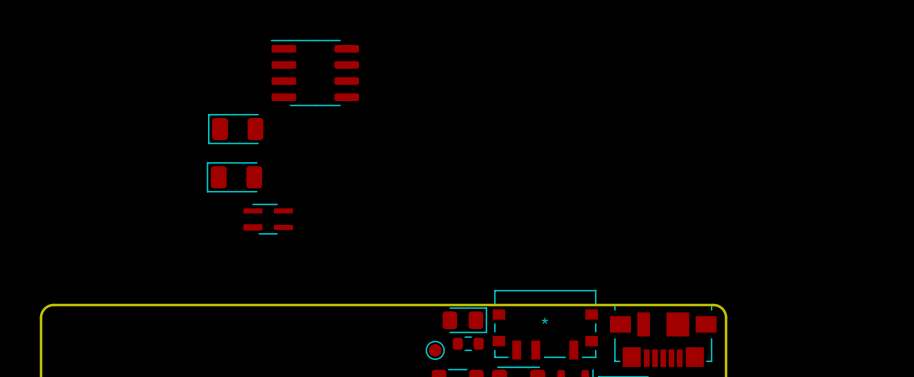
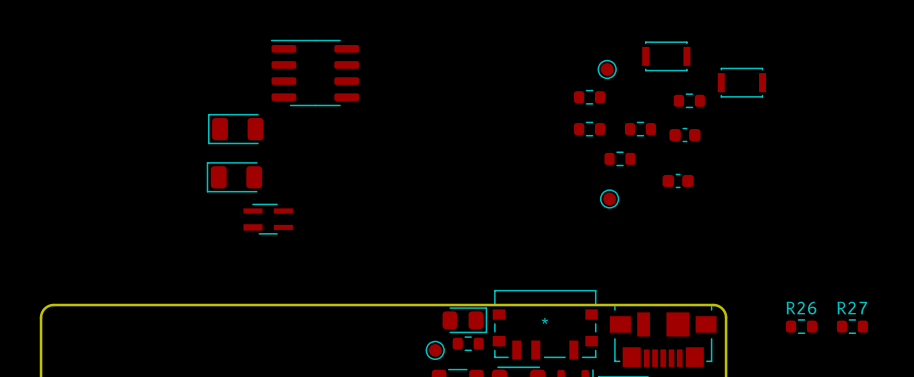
part: none -> (666, 56)
part: none -> (607, 69)
part: none -> (741, 82)
part: none -> (589, 97)
part: none -> (689, 100)
part: none -> (589, 129)
part: none -> (640, 129)
part: none -> (684, 135)
part: none -> (620, 158)
part: none -> (678, 180)
part: none -> (609, 198)
R26: none -> (801, 326)
R27: none -> (852, 326)

